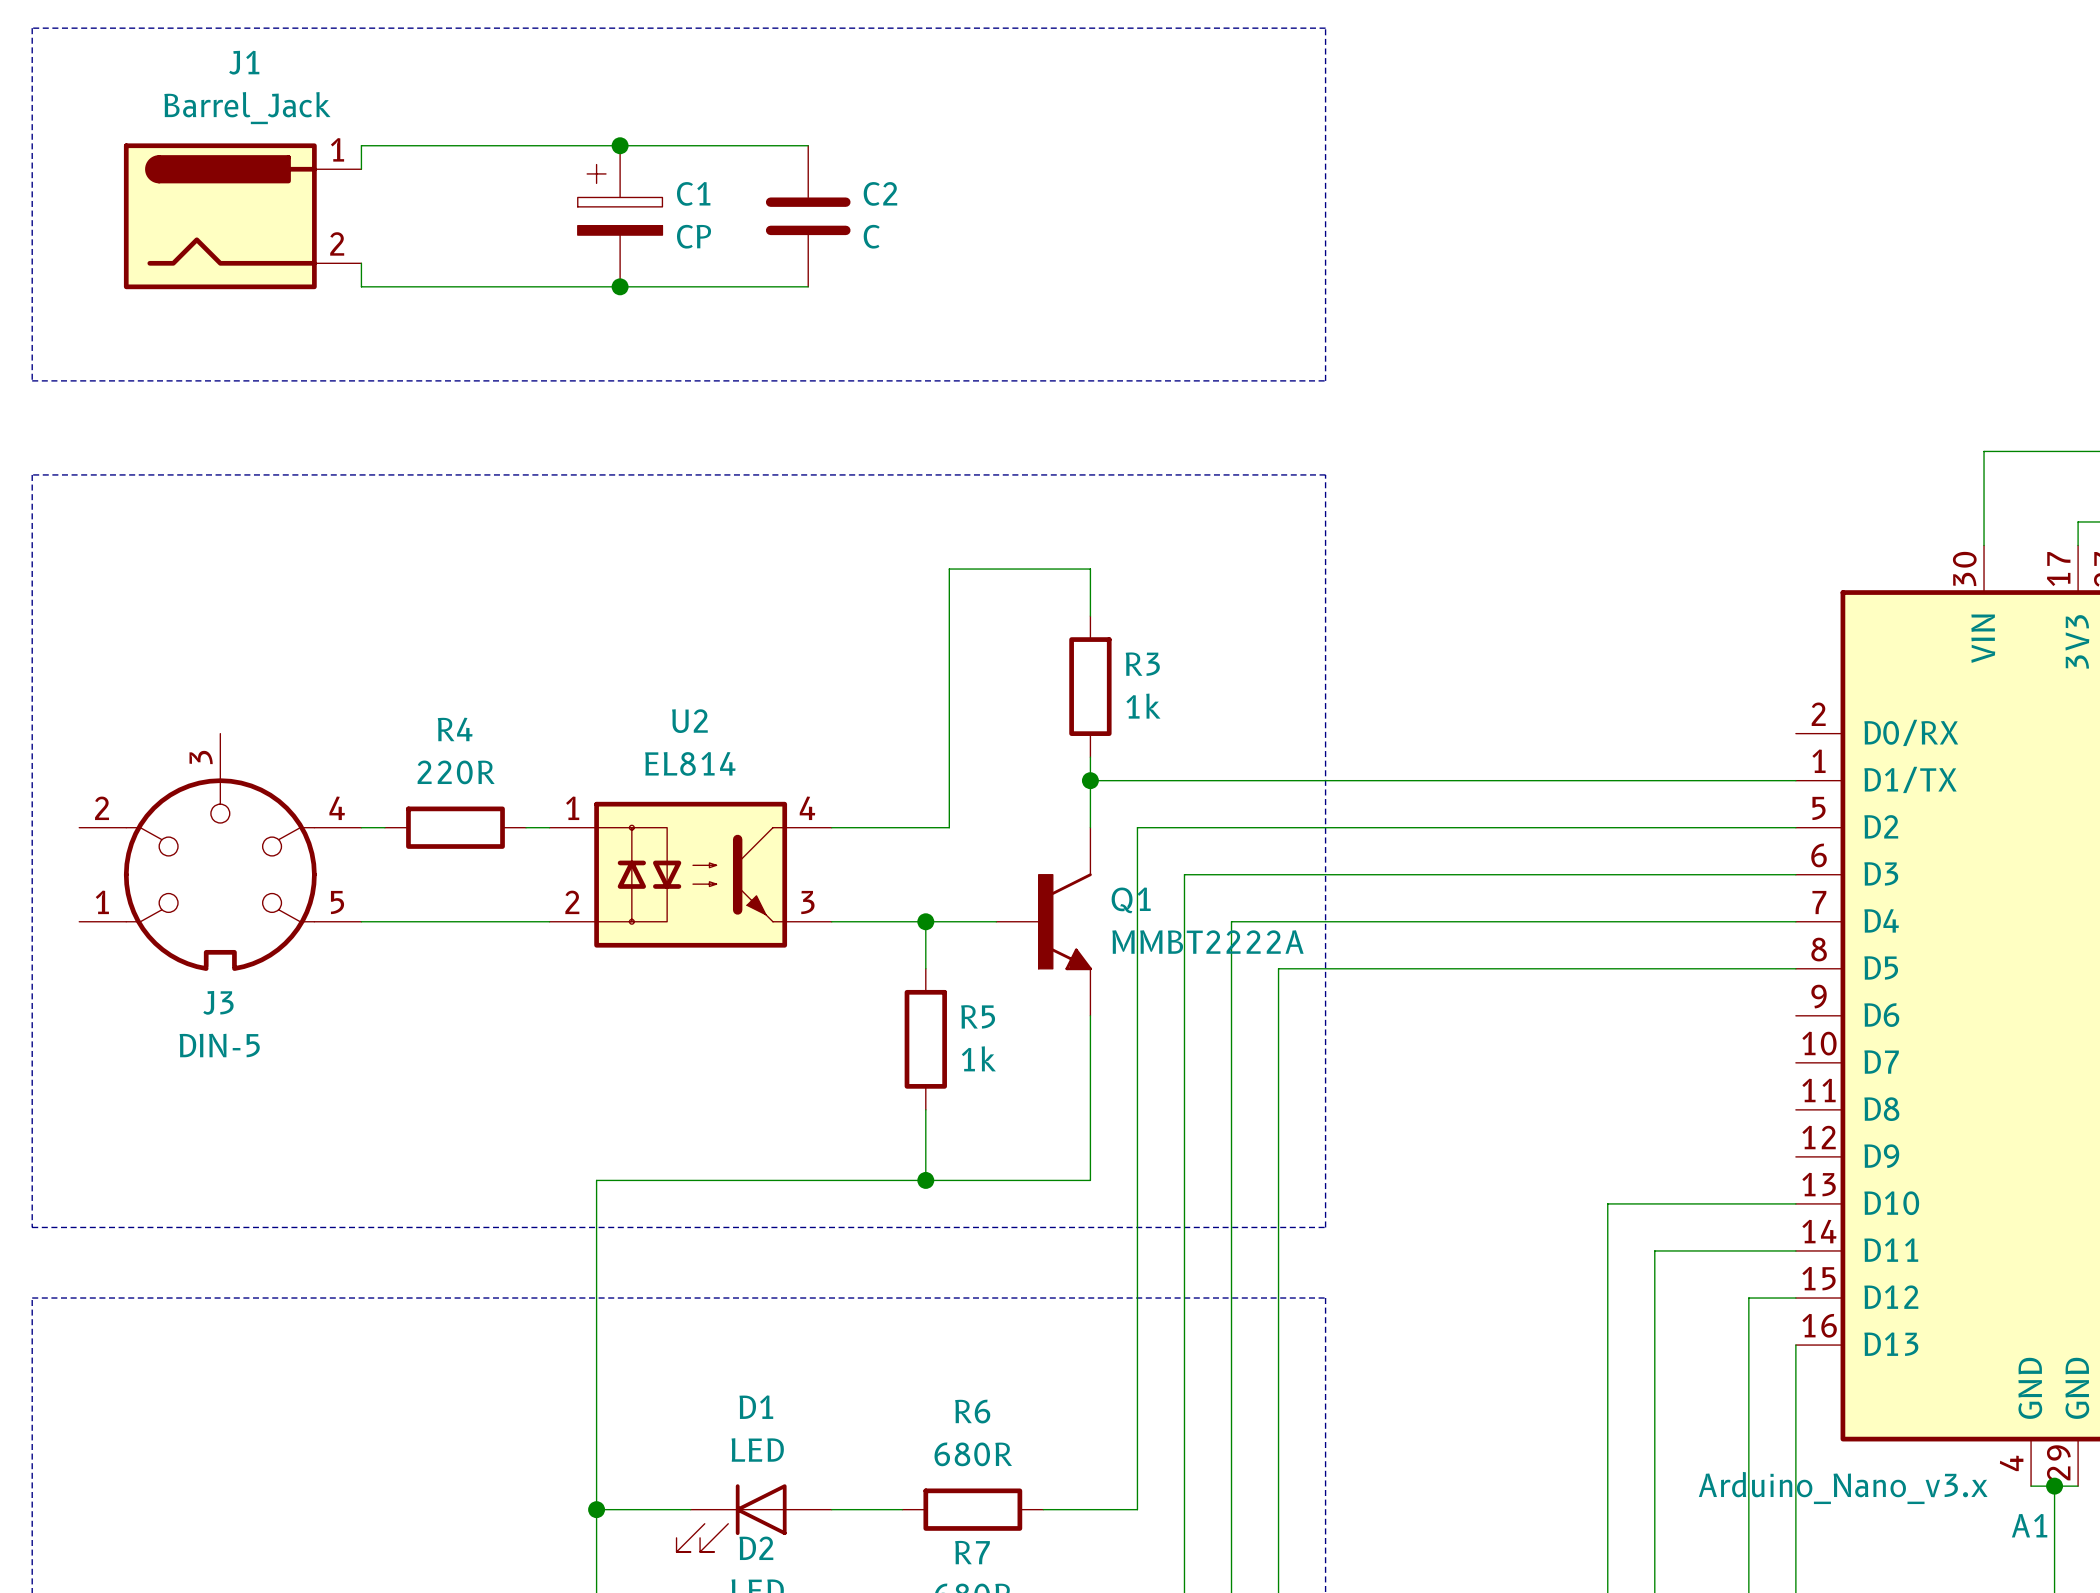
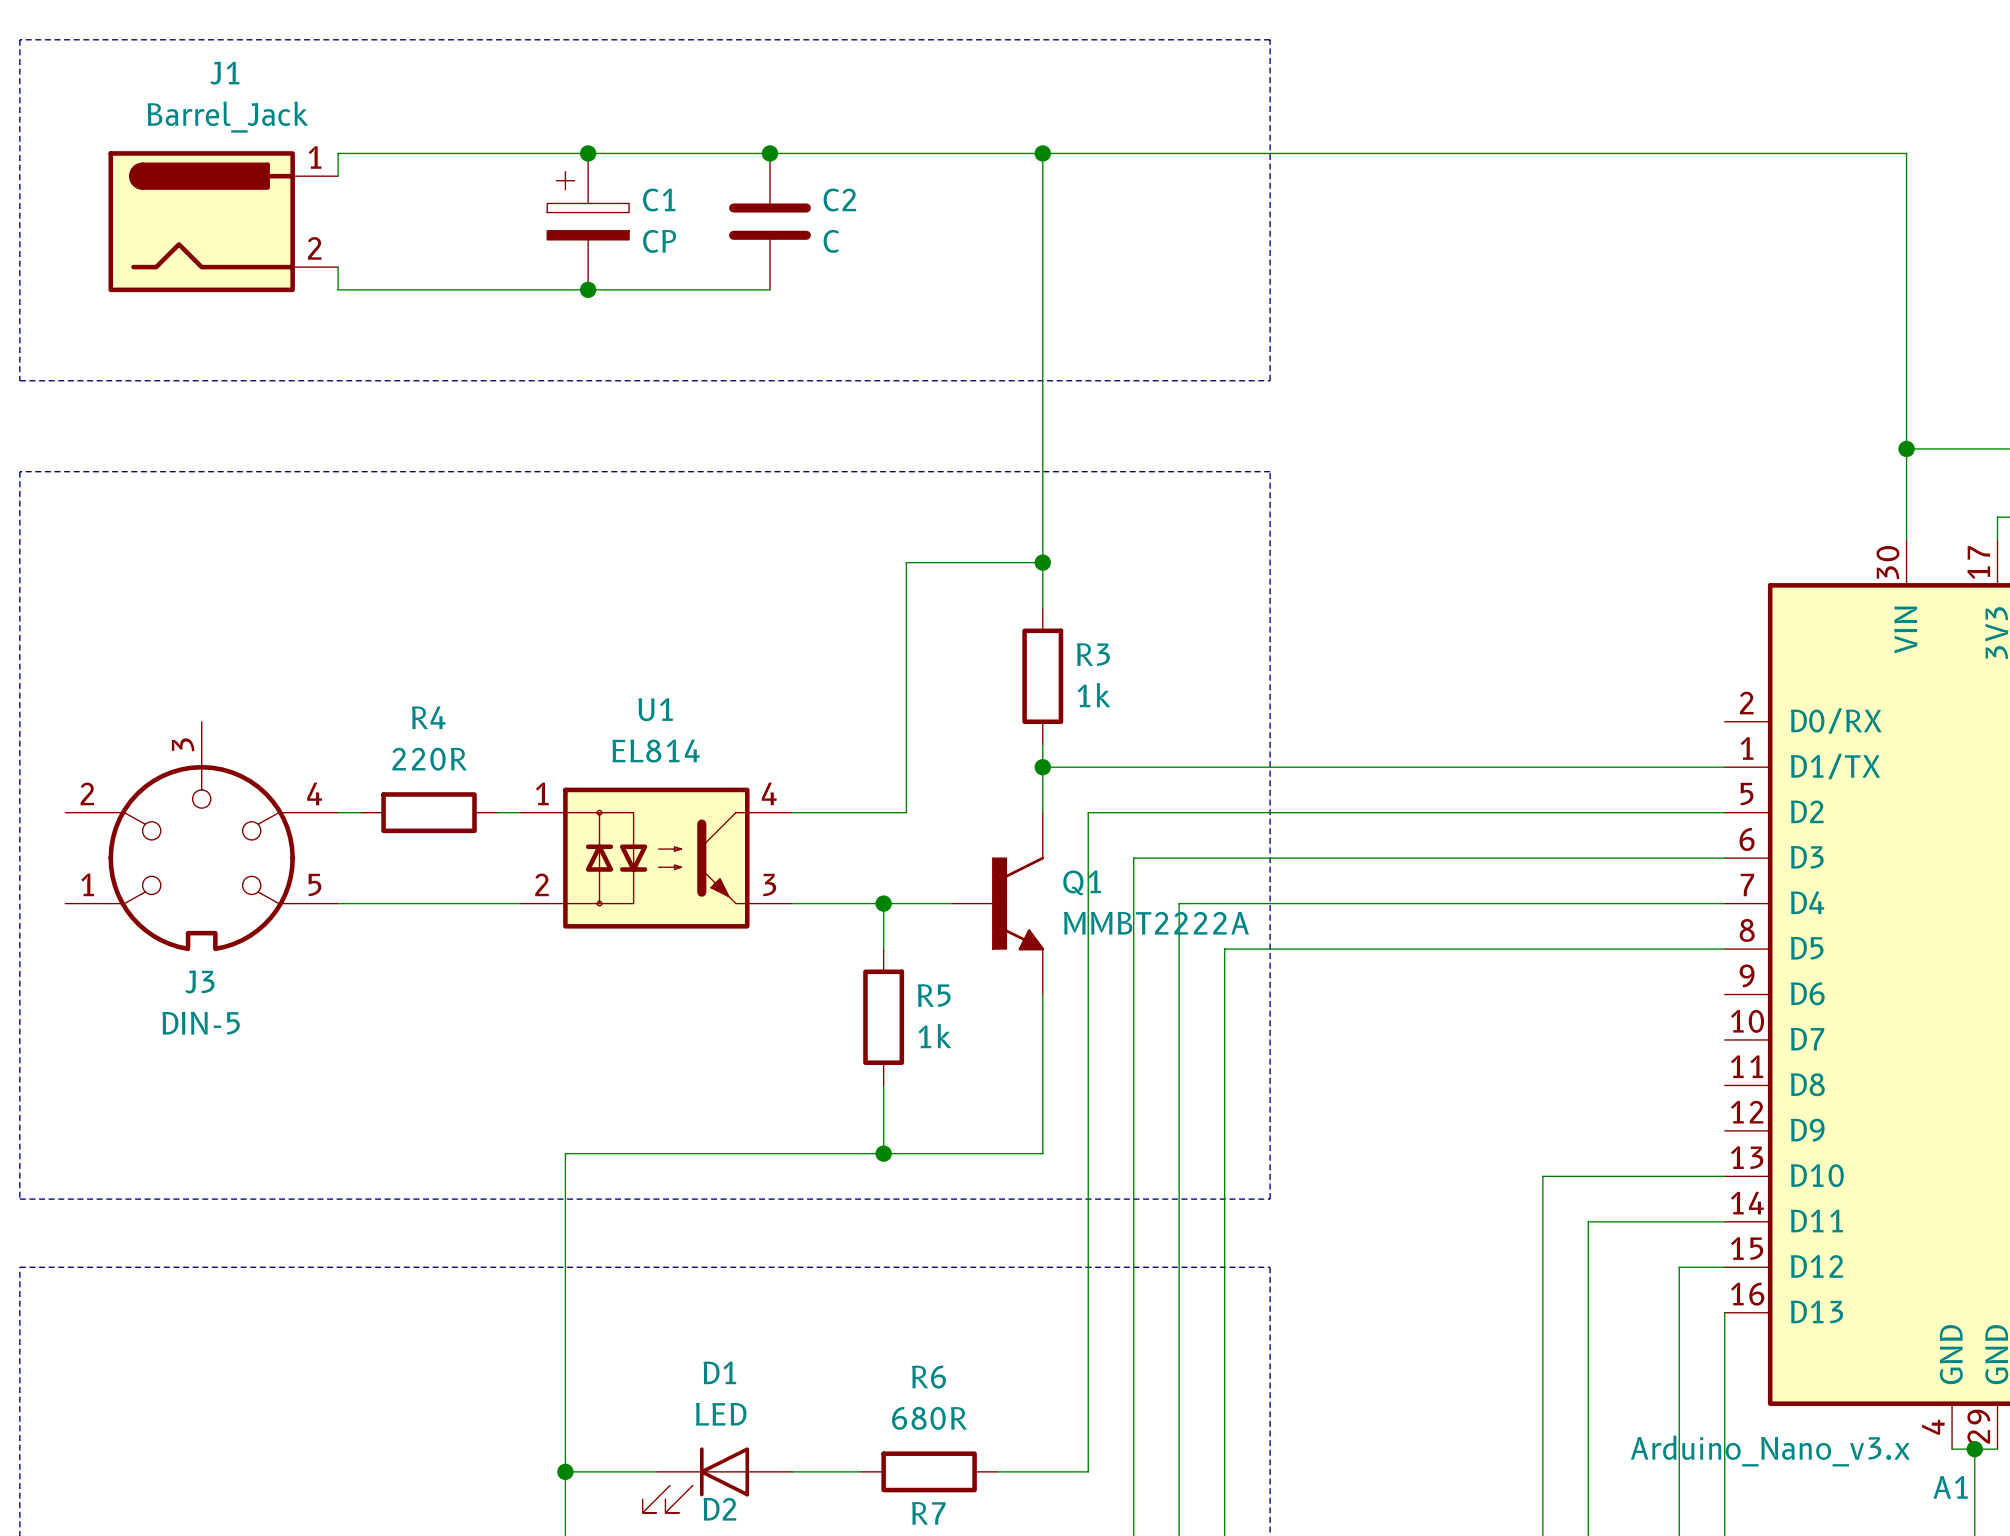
wire: none -> (769, 153) (1906, 153) (1906, 448)
junction: none -> (769, 153)
wire: none -> (1042, 153) (1042, 562)
junction: none -> (1042, 153)
junction: none -> (1906, 448)
junction: none -> (1042, 562)
U2 name: U2 (689, 721) -> U1 (655, 709)

